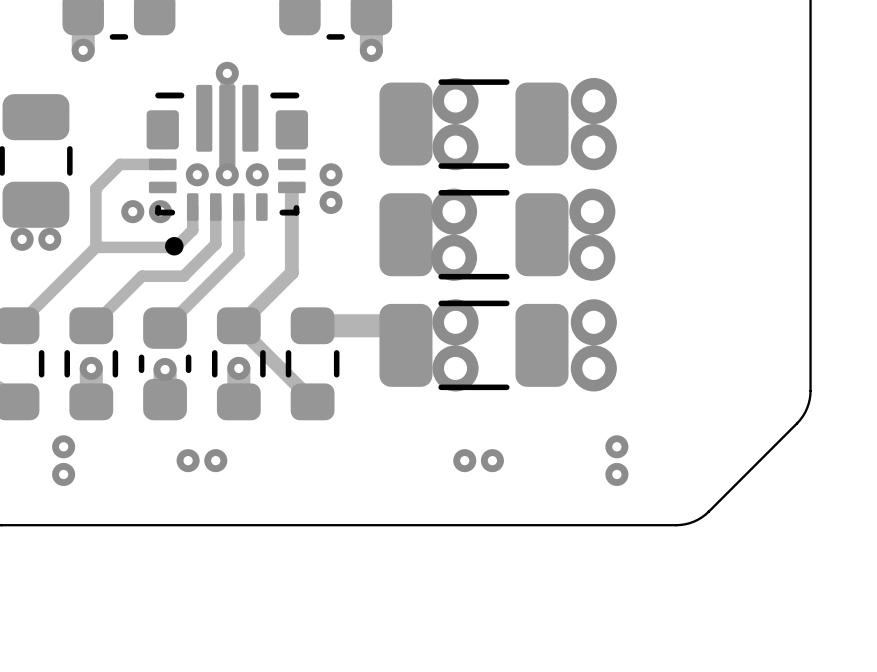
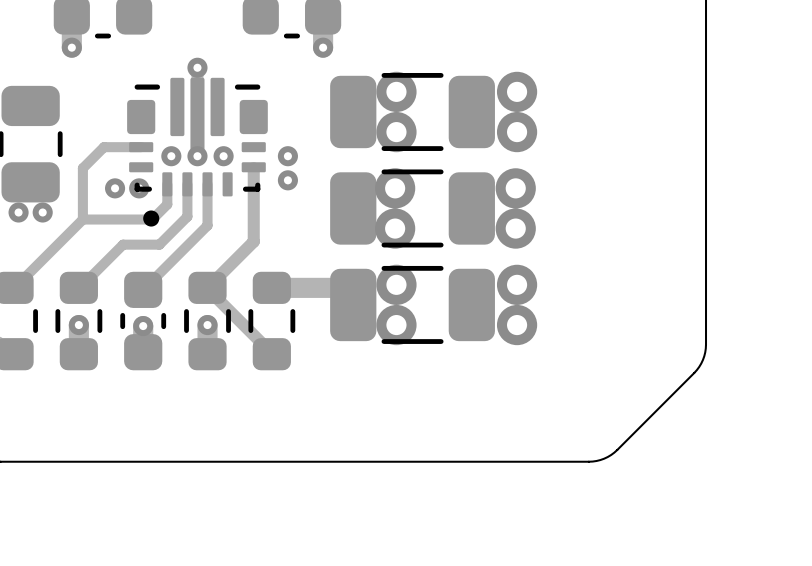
via: (63, 446) -> none
via: (616, 446) -> none
via: (188, 460) -> none
via: (215, 460) -> none
via: (464, 460) -> none
via: (492, 460) -> none
via: (63, 474) -> none
via: (616, 474) -> none

